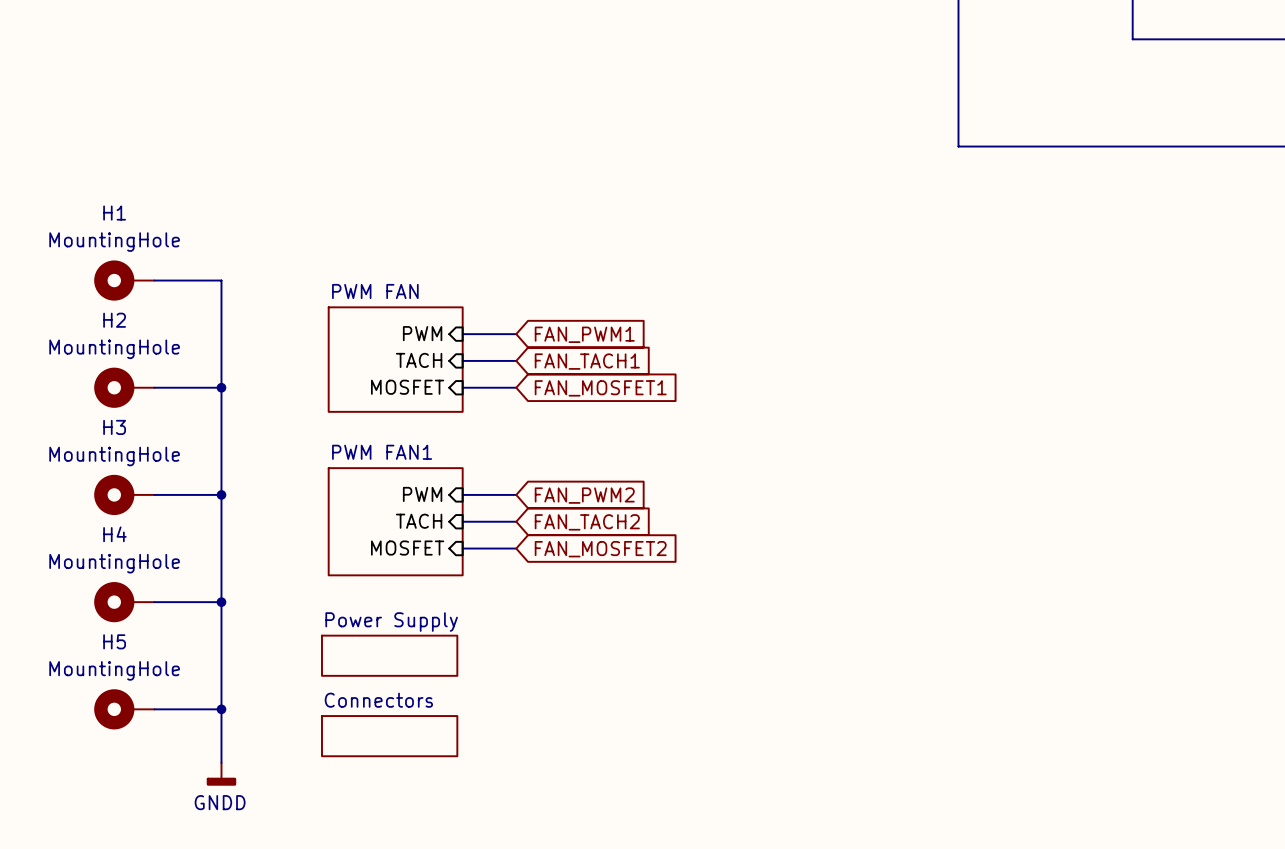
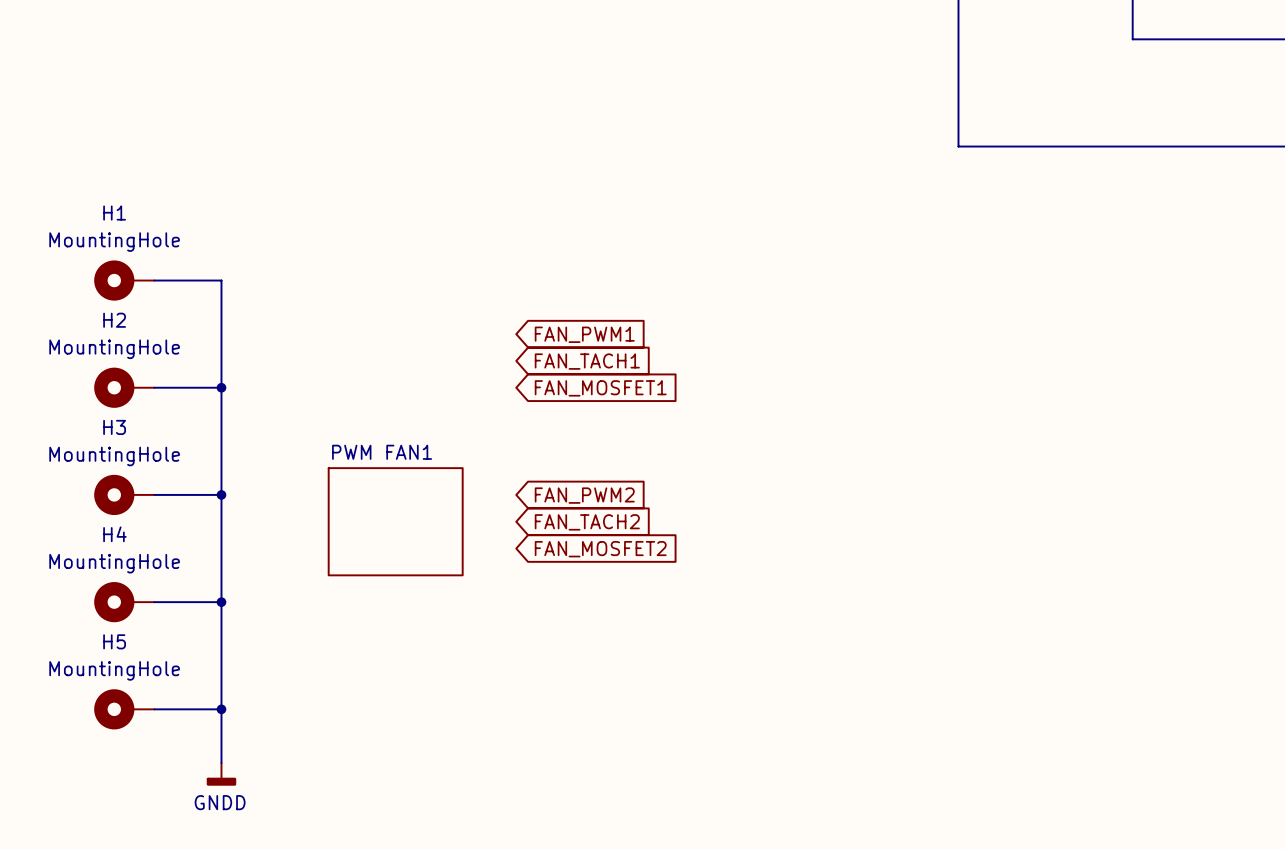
sheet pin: PWM (422, 333) -> none
wire: (462, 334) (516, 334) -> none
sheet PWM FAN: (395, 359) -> none
sheet pin: TACH (419, 360) -> none
wire: (462, 360) (516, 360) -> none
sheet pin: MOSFET (407, 387) -> none
wire: (462, 387) (516, 387) -> none
sheet pin: PWM (422, 494) -> none
wire: (462, 494) (516, 494) -> none
sheet pin: TACH (419, 521) -> none
wire: (462, 521) (516, 521) -> none
sheet pin: MOSFET (407, 548) -> none
wire: (462, 548) (516, 548) -> none
sheet Power Supply: (389, 655) -> none
sheet Connectors: (389, 736) -> none

